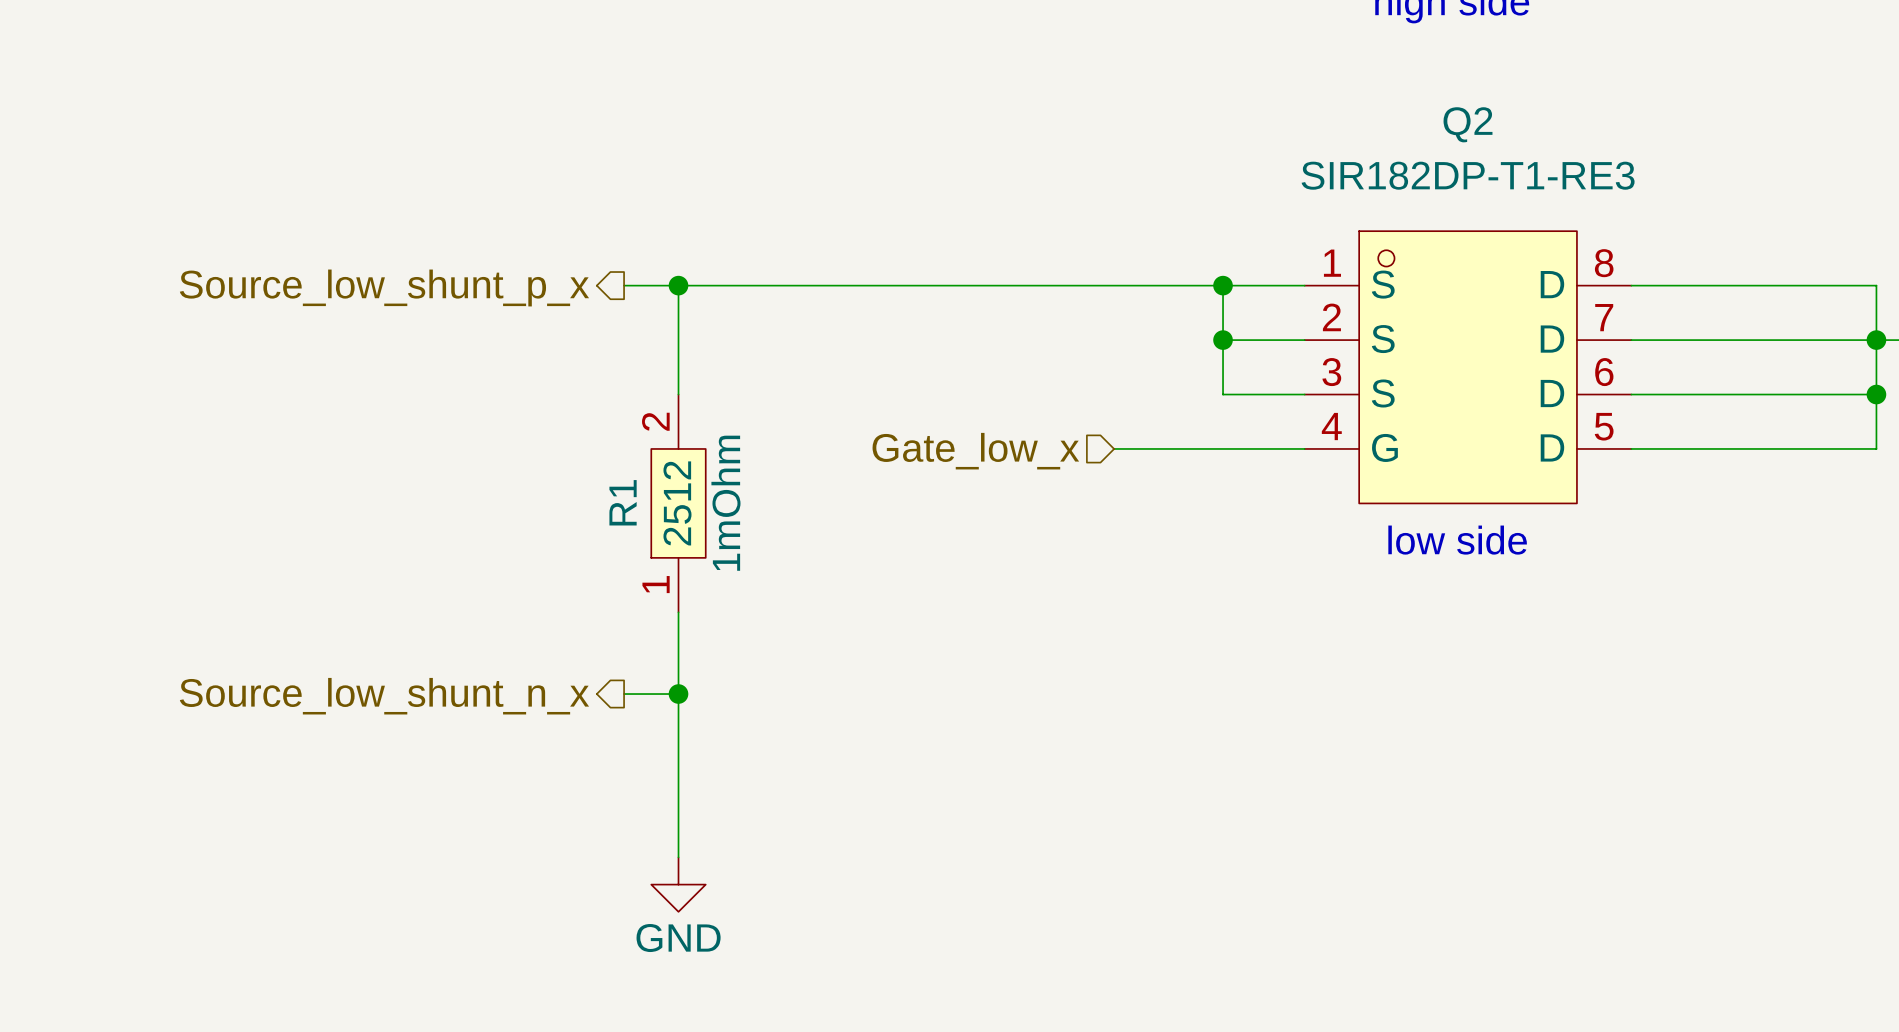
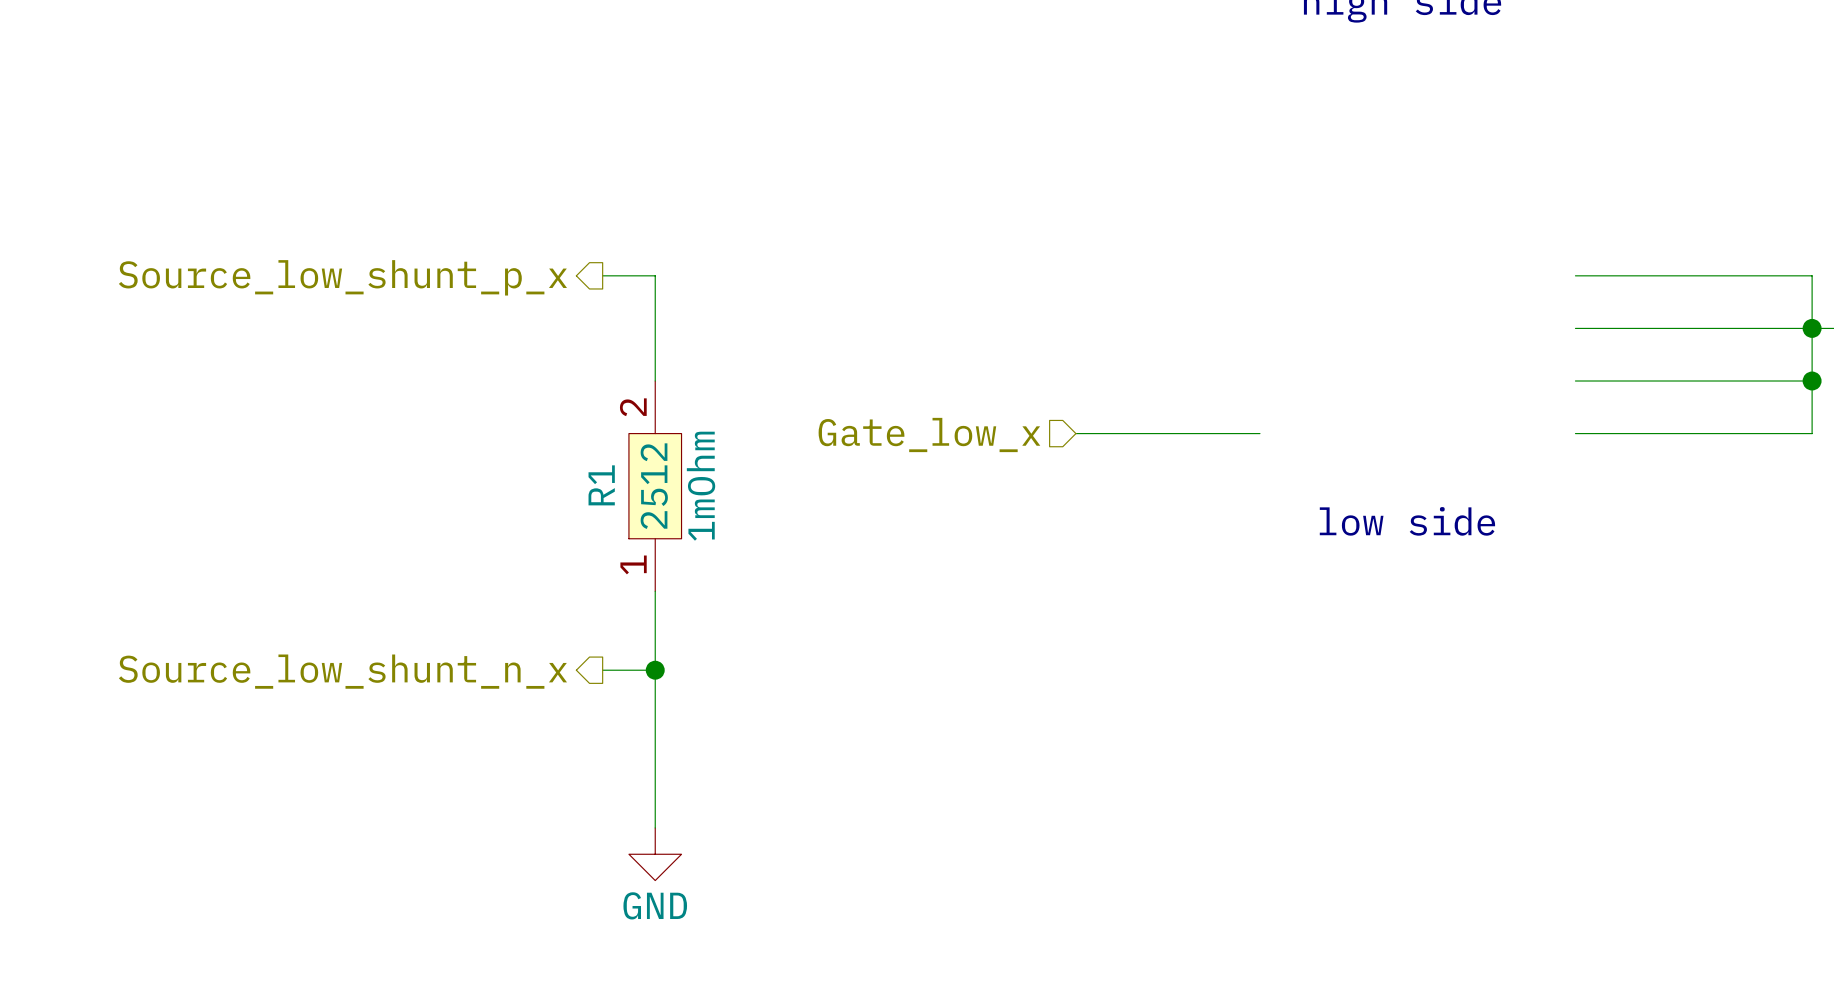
wire: (678, 285) (1304, 285) -> none
junction: (678, 285) -> none
wire: (1223, 285) (1223, 394) (1304, 394) -> none
junction: (1223, 285) -> none
wire: (1223, 340) (1304, 340) -> none
junction: (1223, 340) -> none
Q2: SIR182DP-T1-RE3 (1468, 367) -> none

